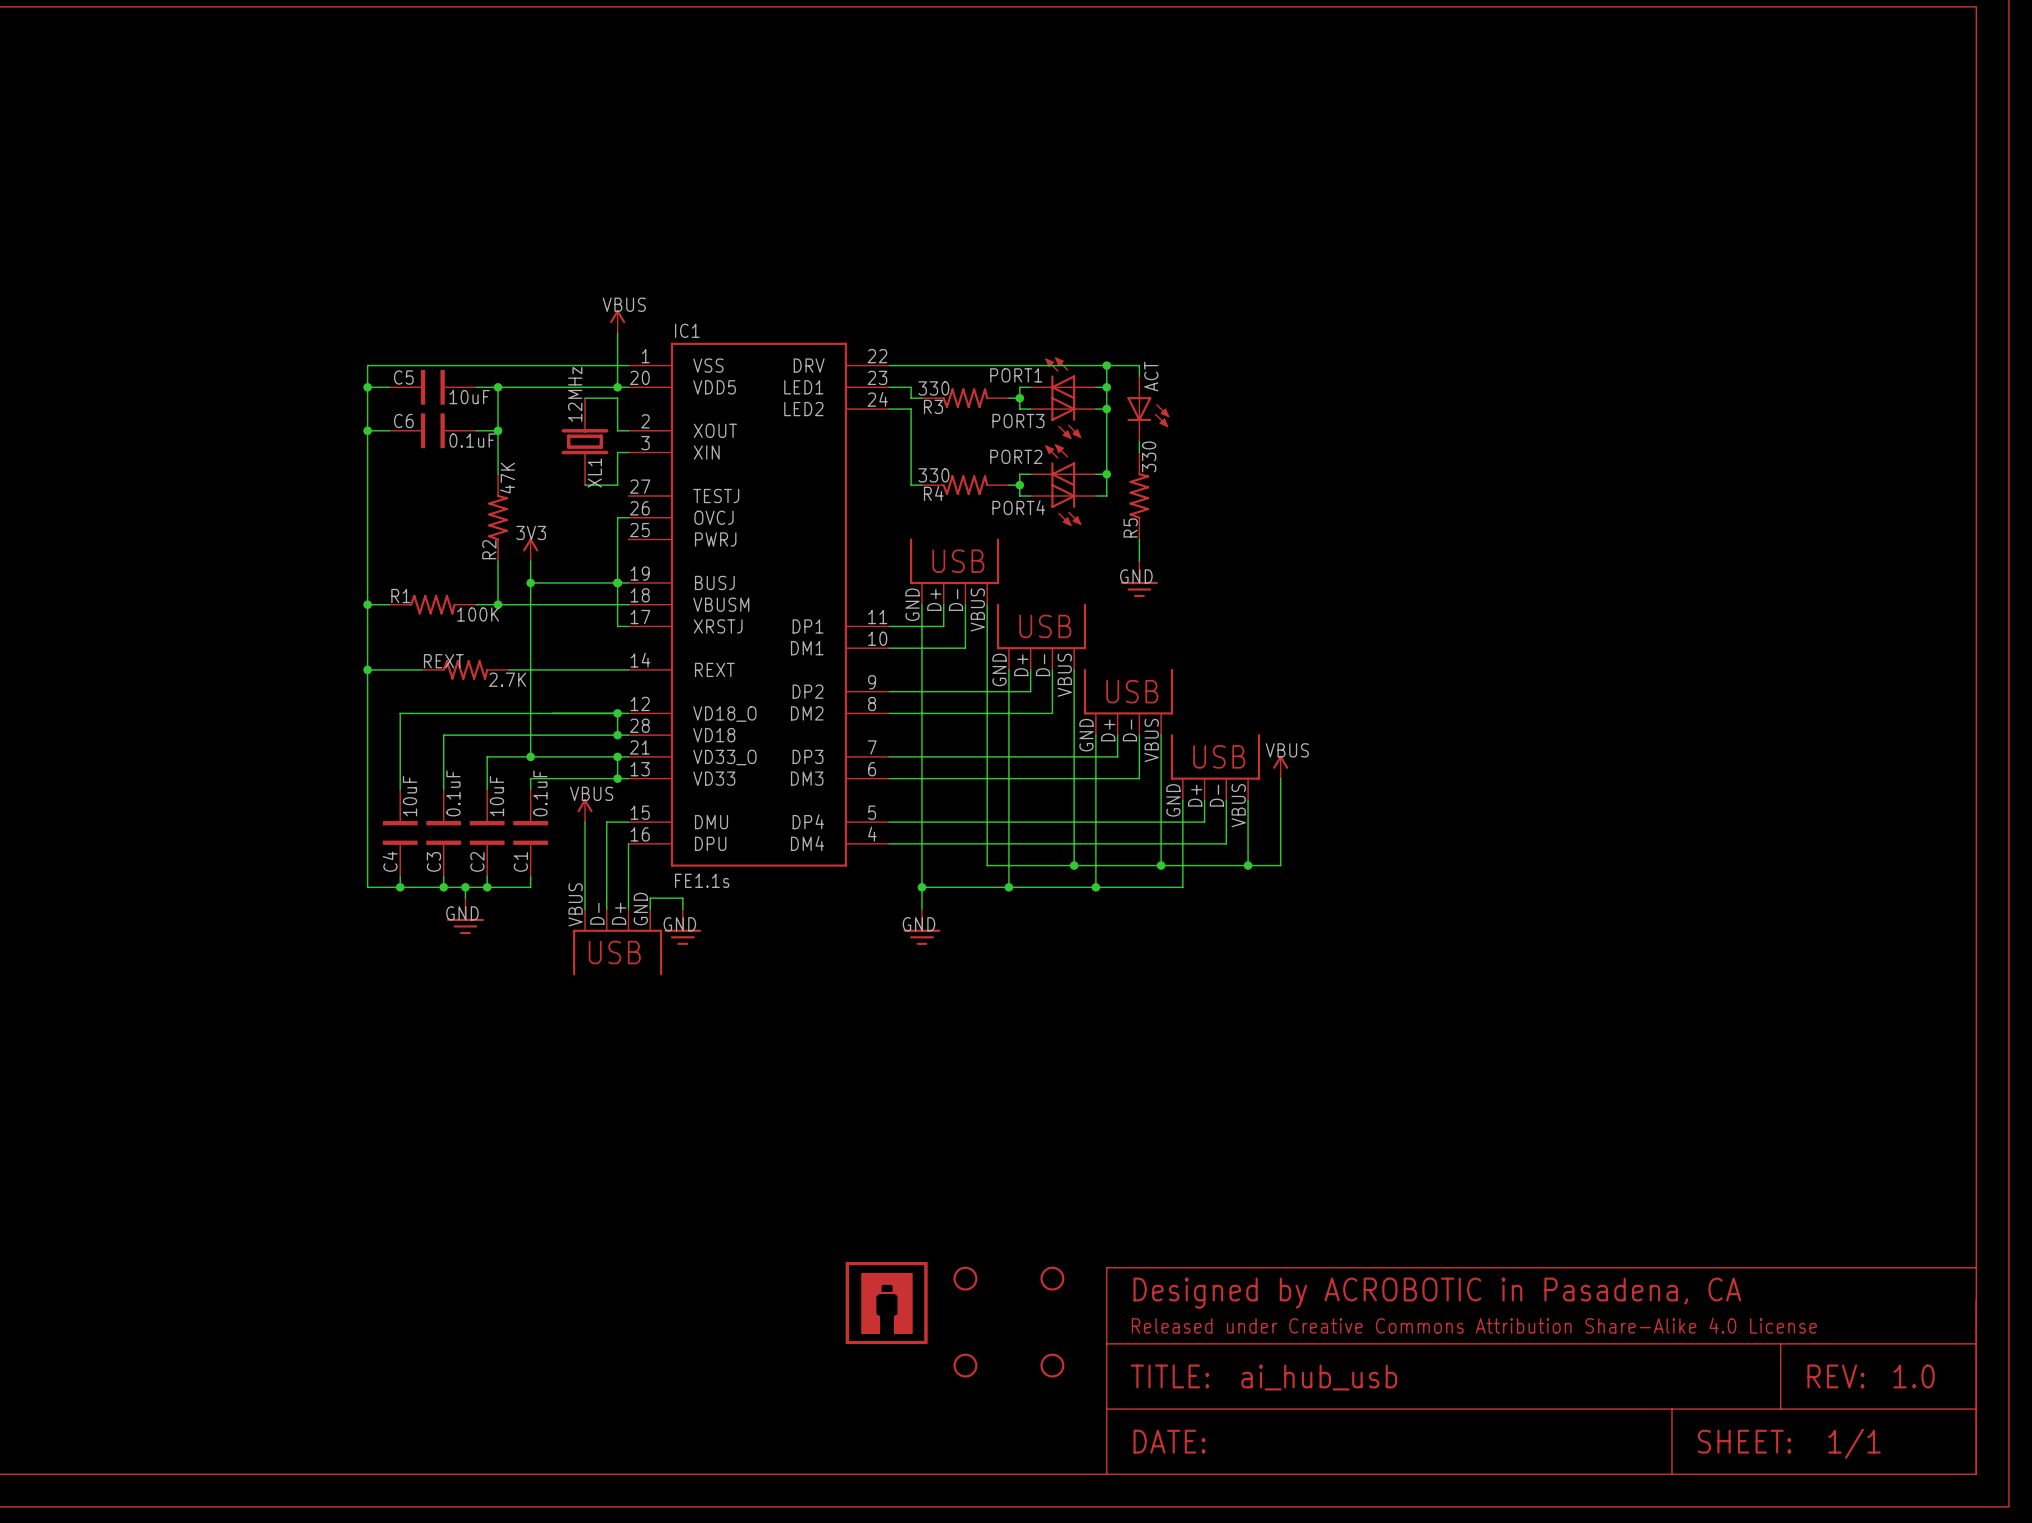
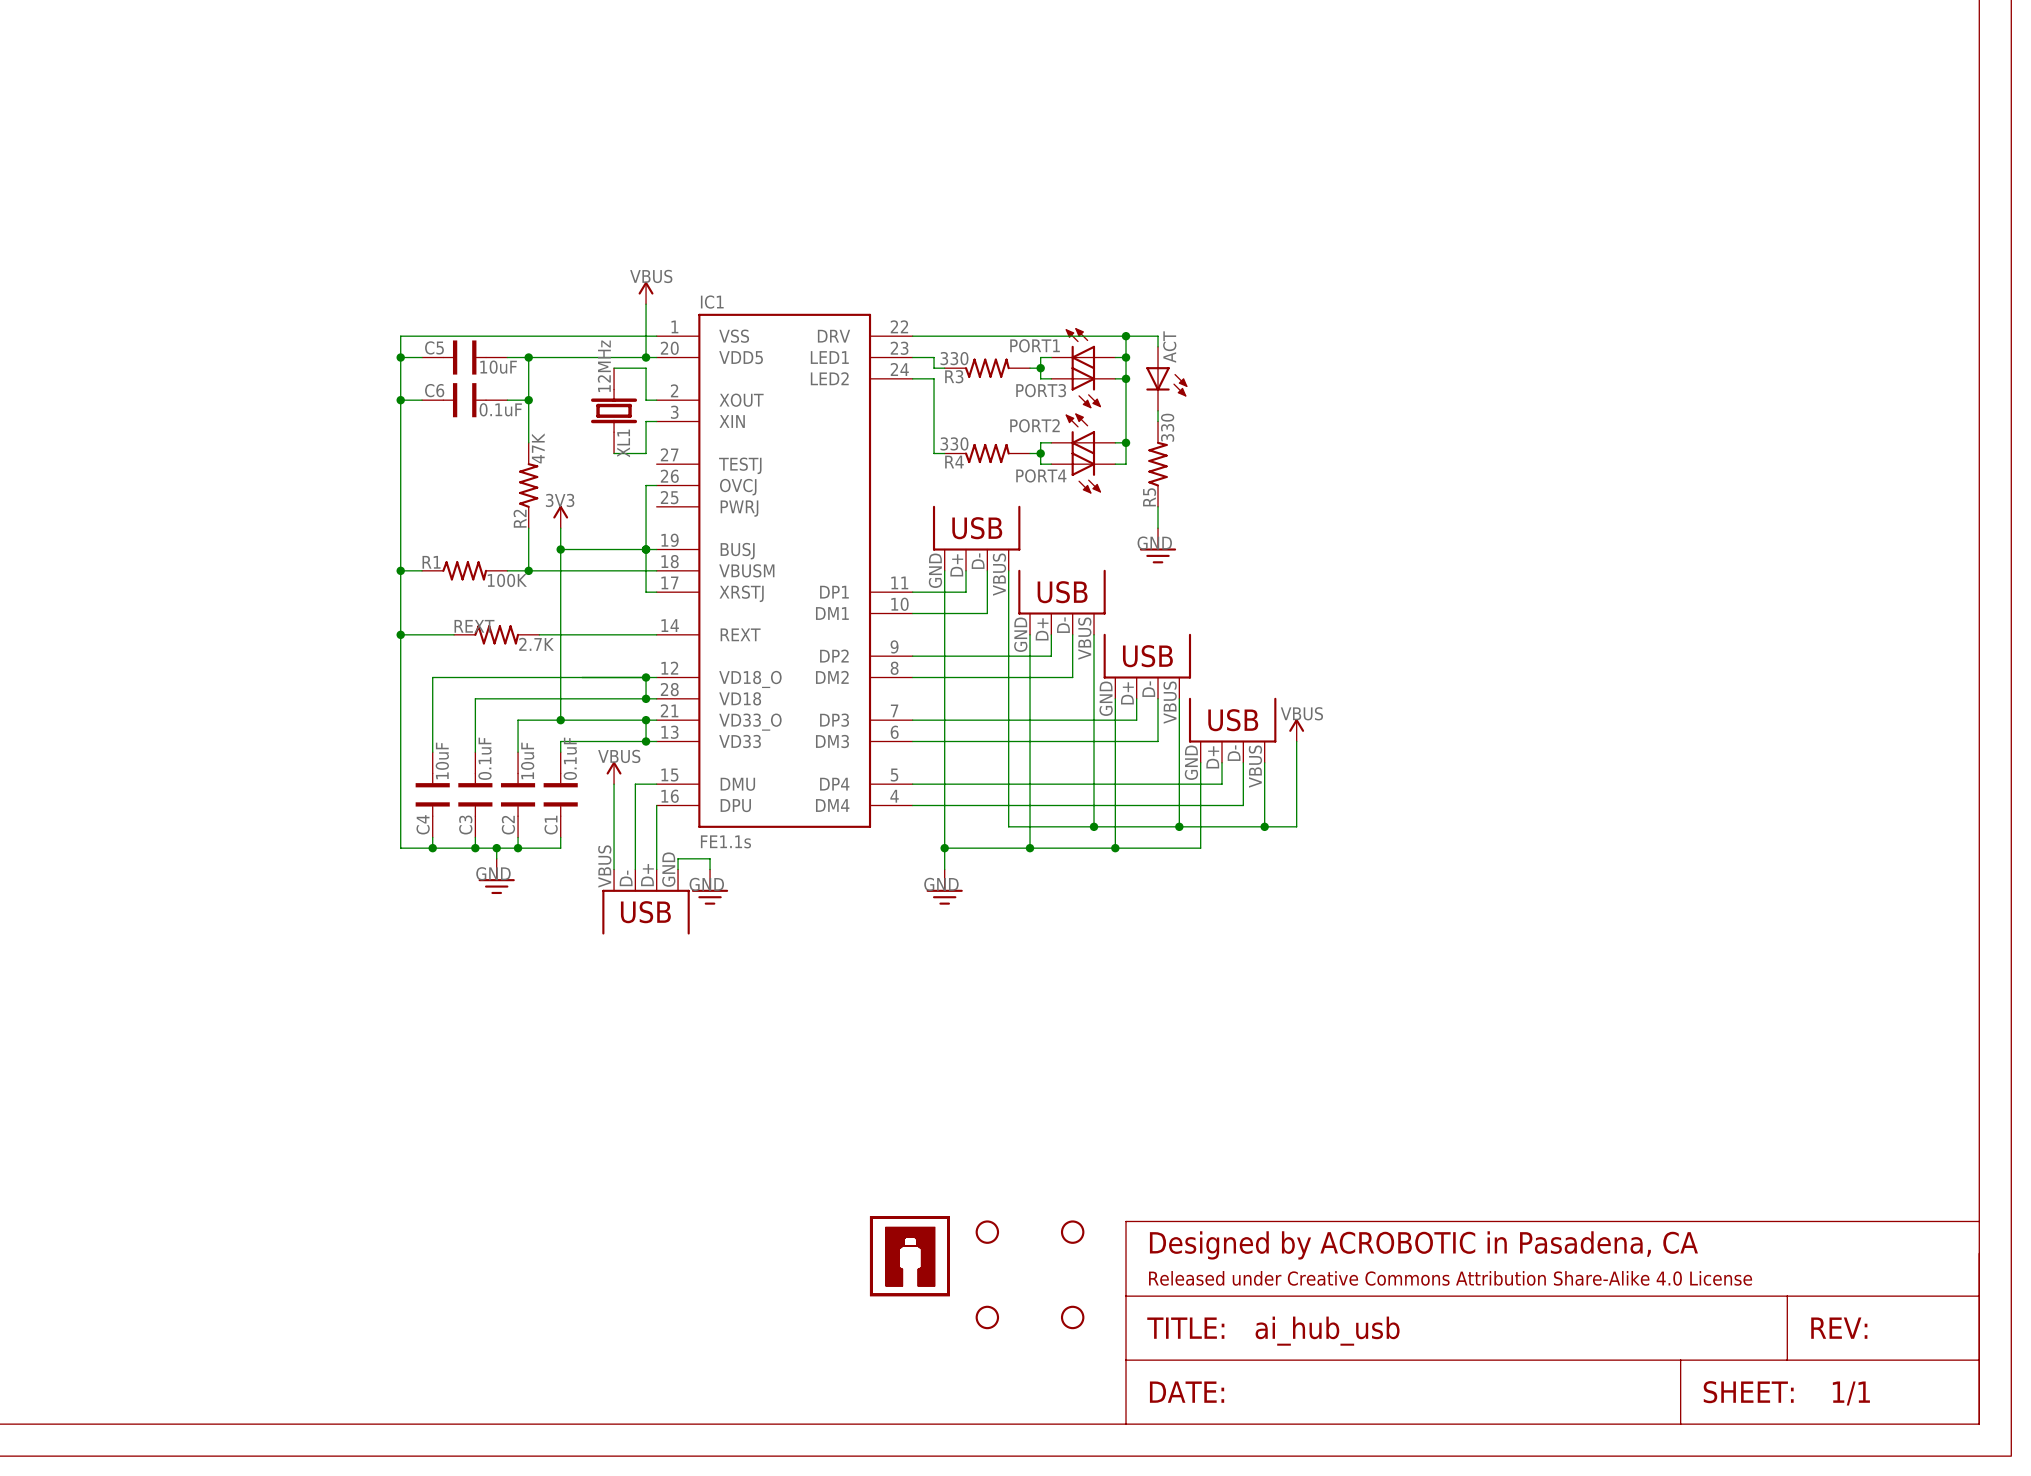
part text: 1.0 (1914, 1376) -> none

